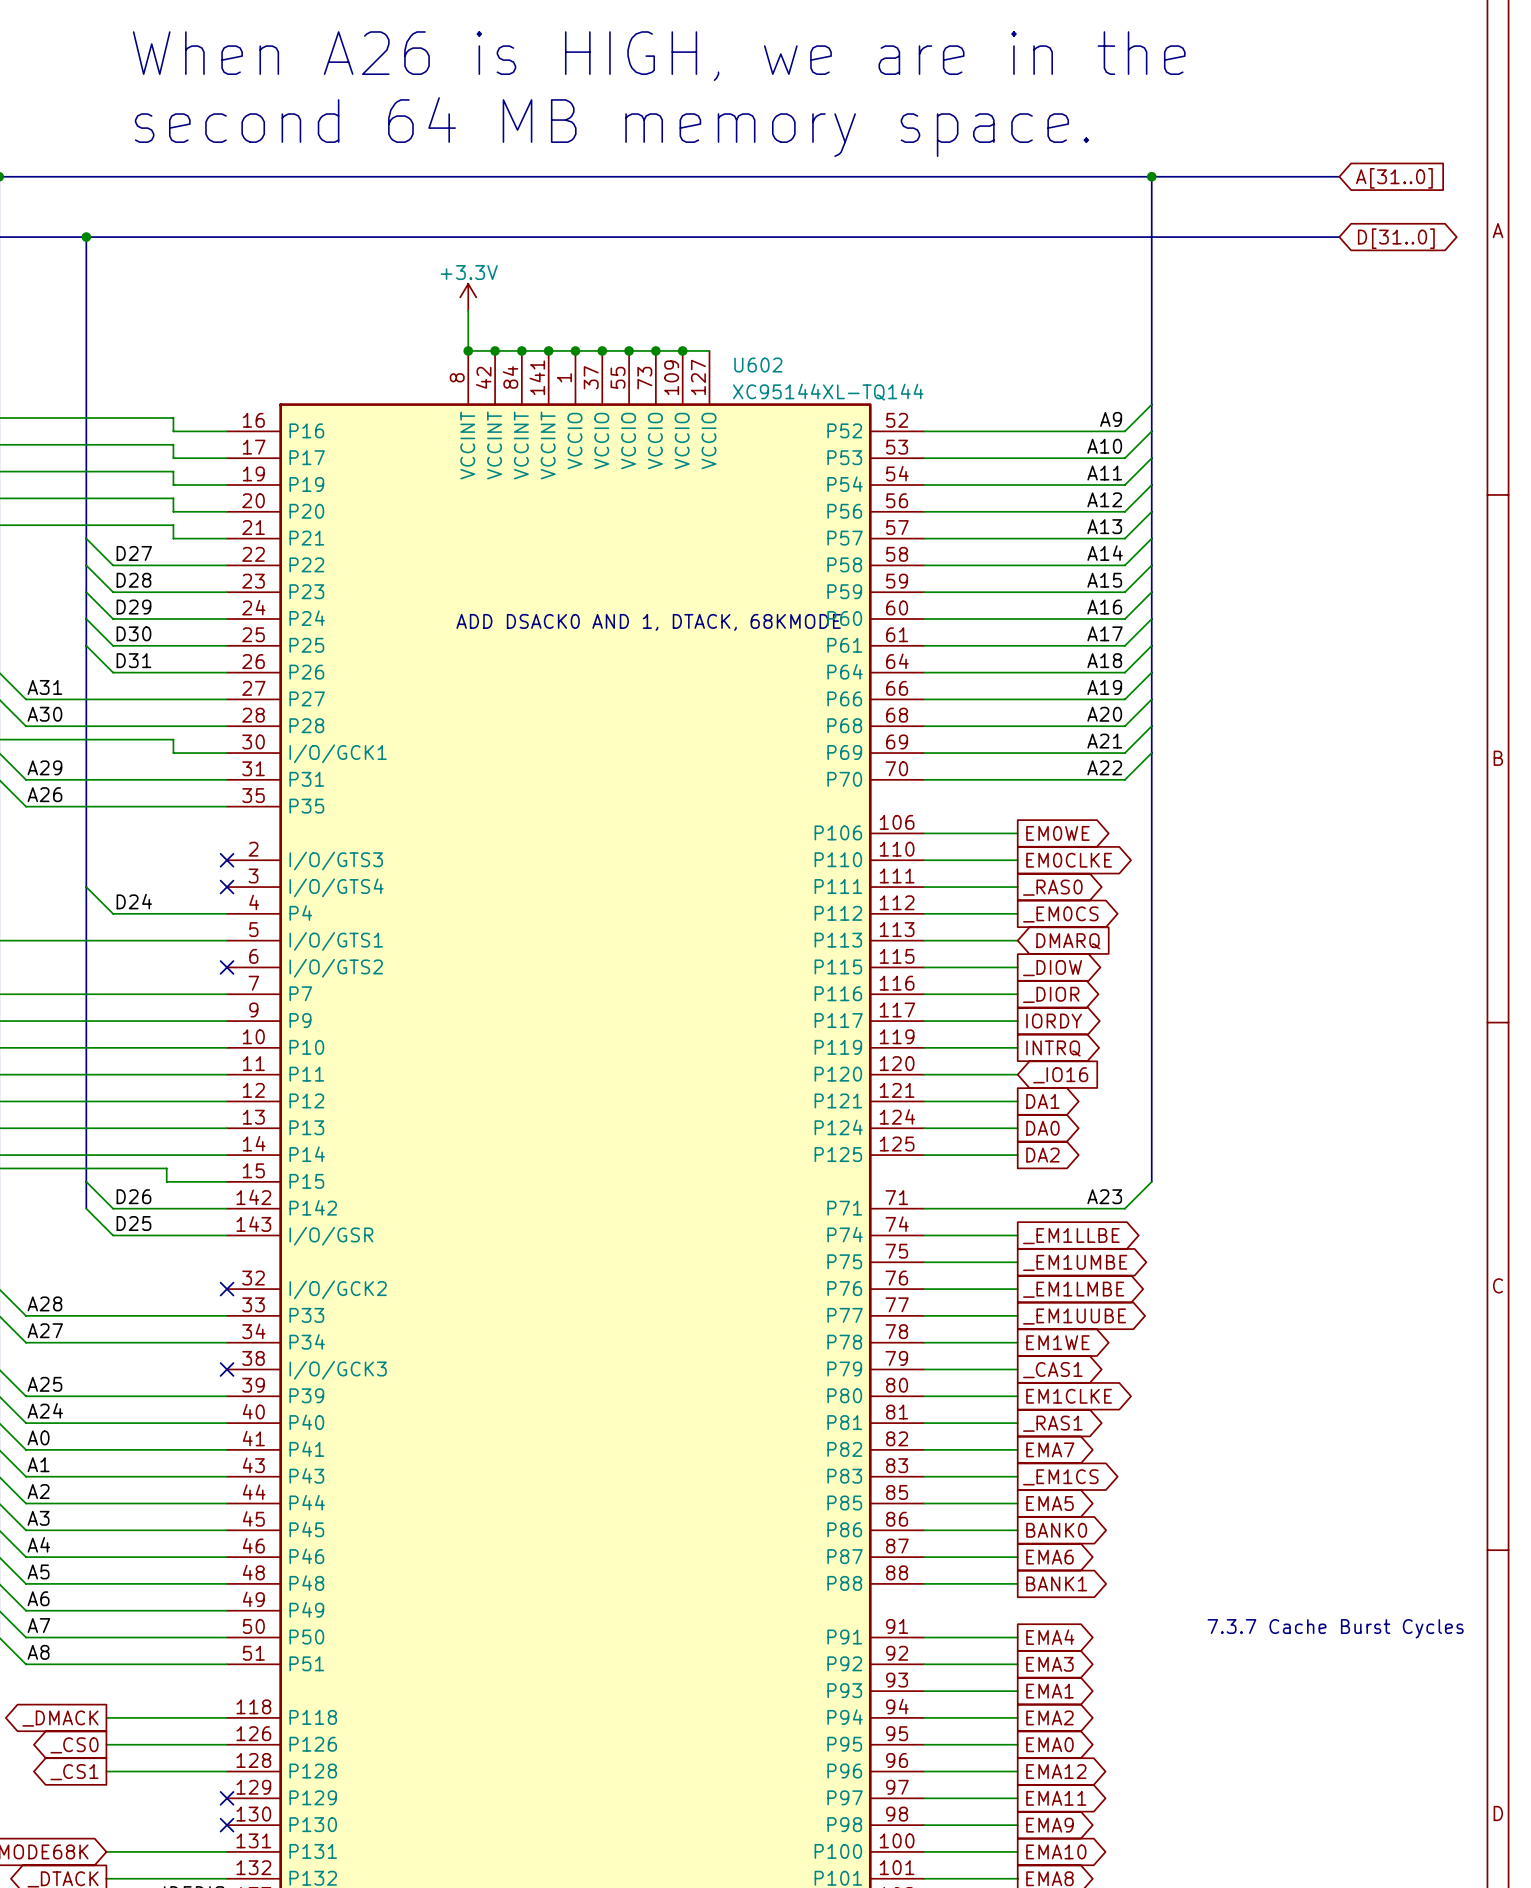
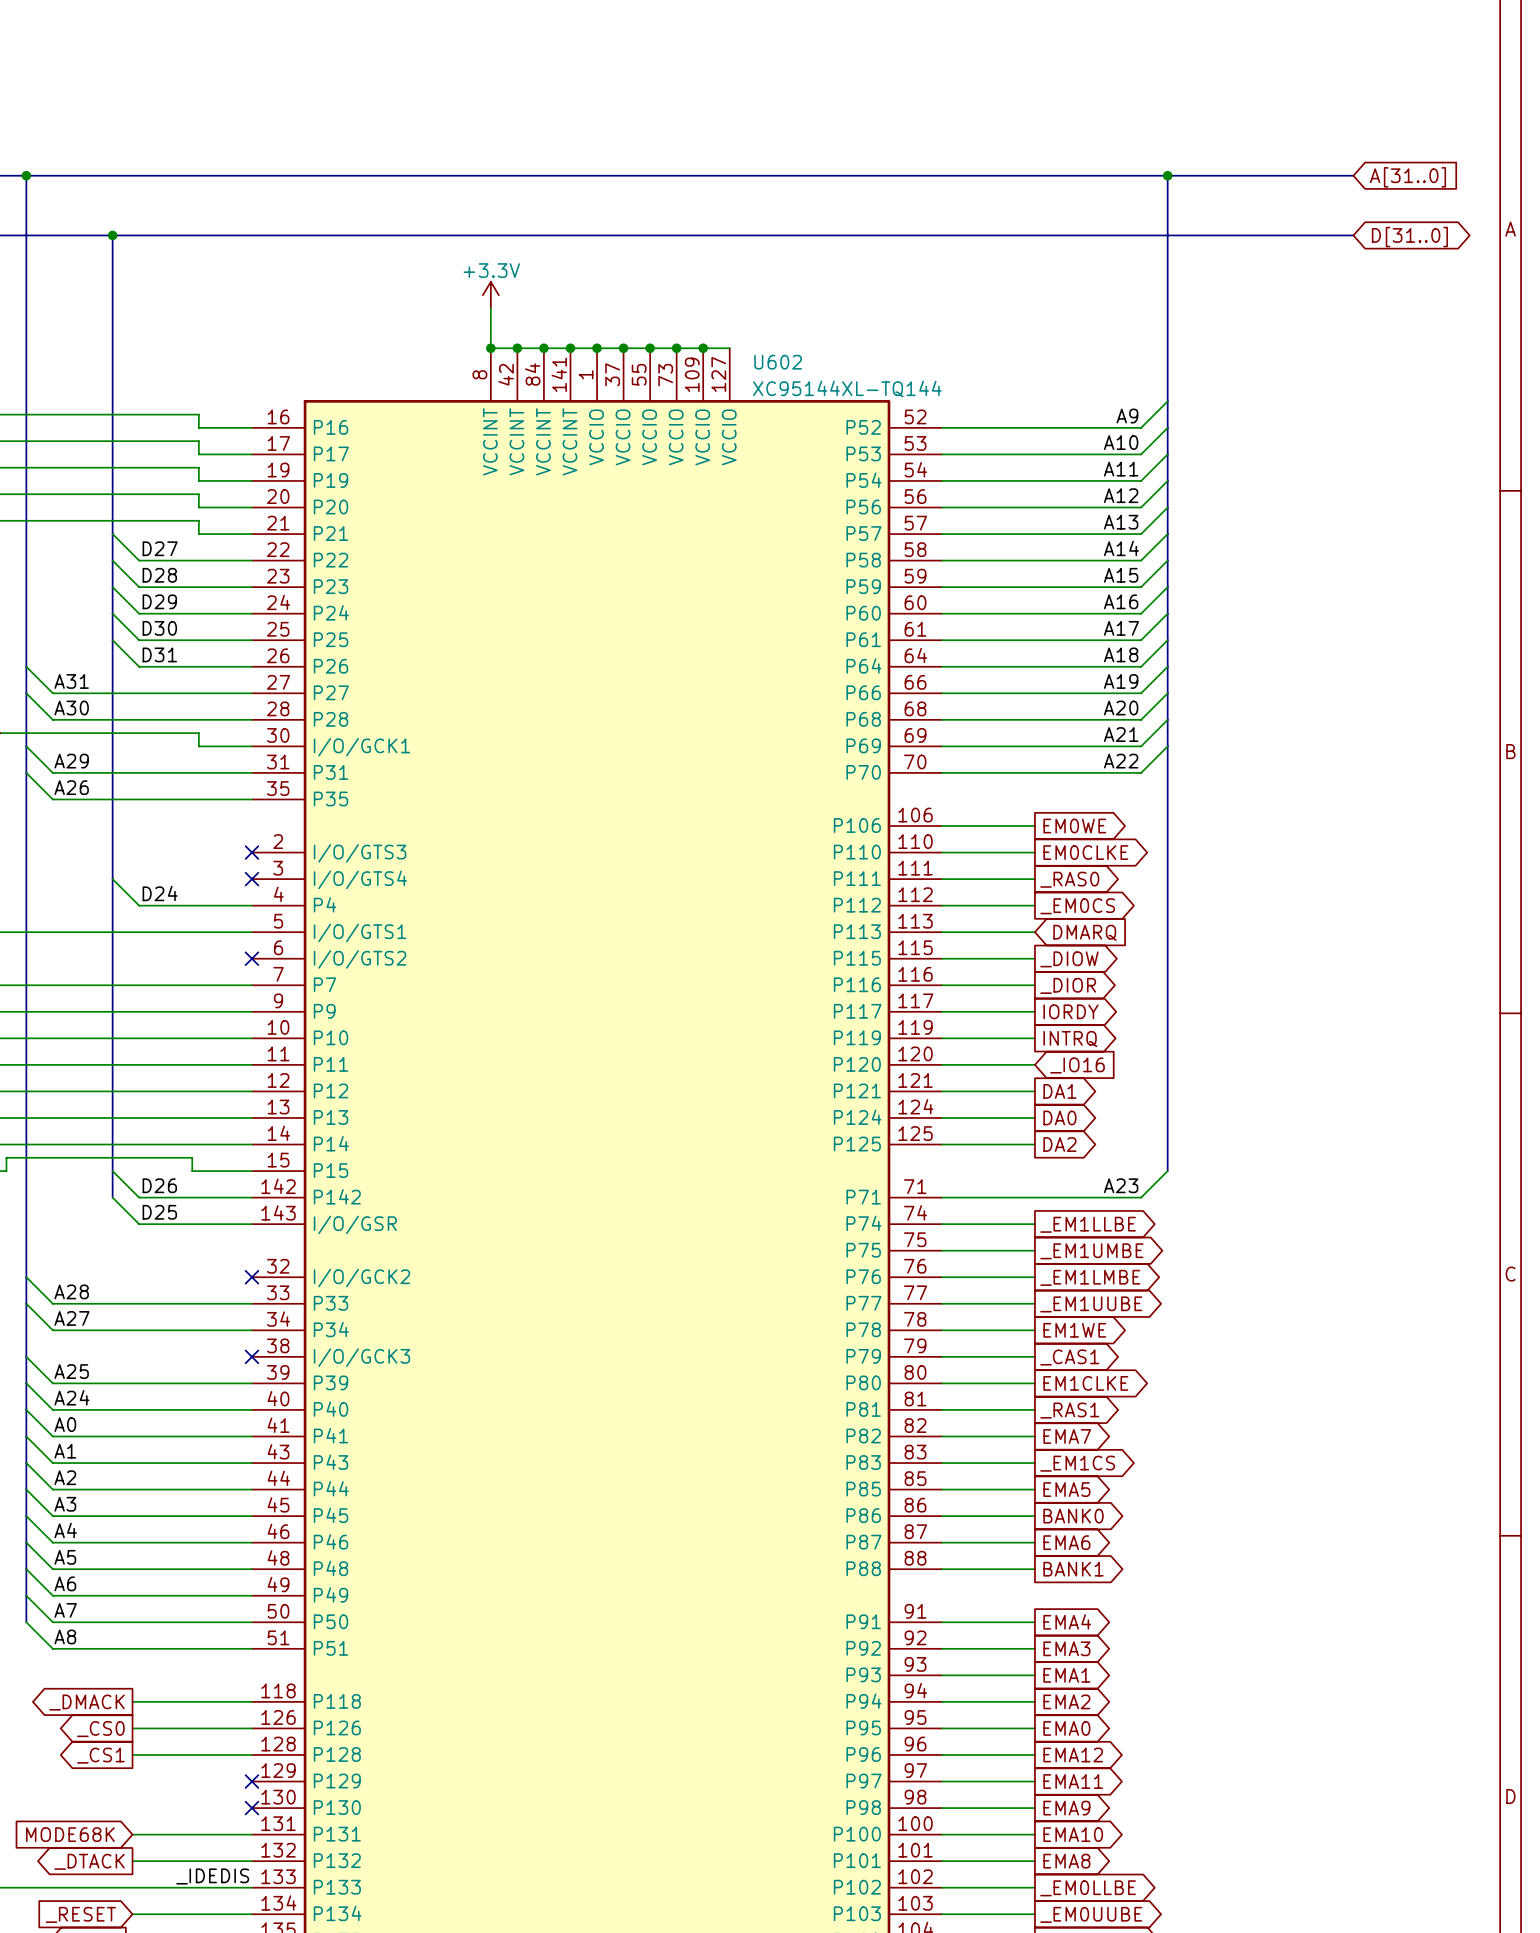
text: When A26 is HIGH, we are in the (659, 56) -> none
text: second 64 MB memory space. (611, 127) -> none
text: ADD DSACK0 AND 1, DTACK, 68KMODE (648, 622) -> none
text: 7.3.7 Cache Burst Cycles (1335, 1628) -> none

